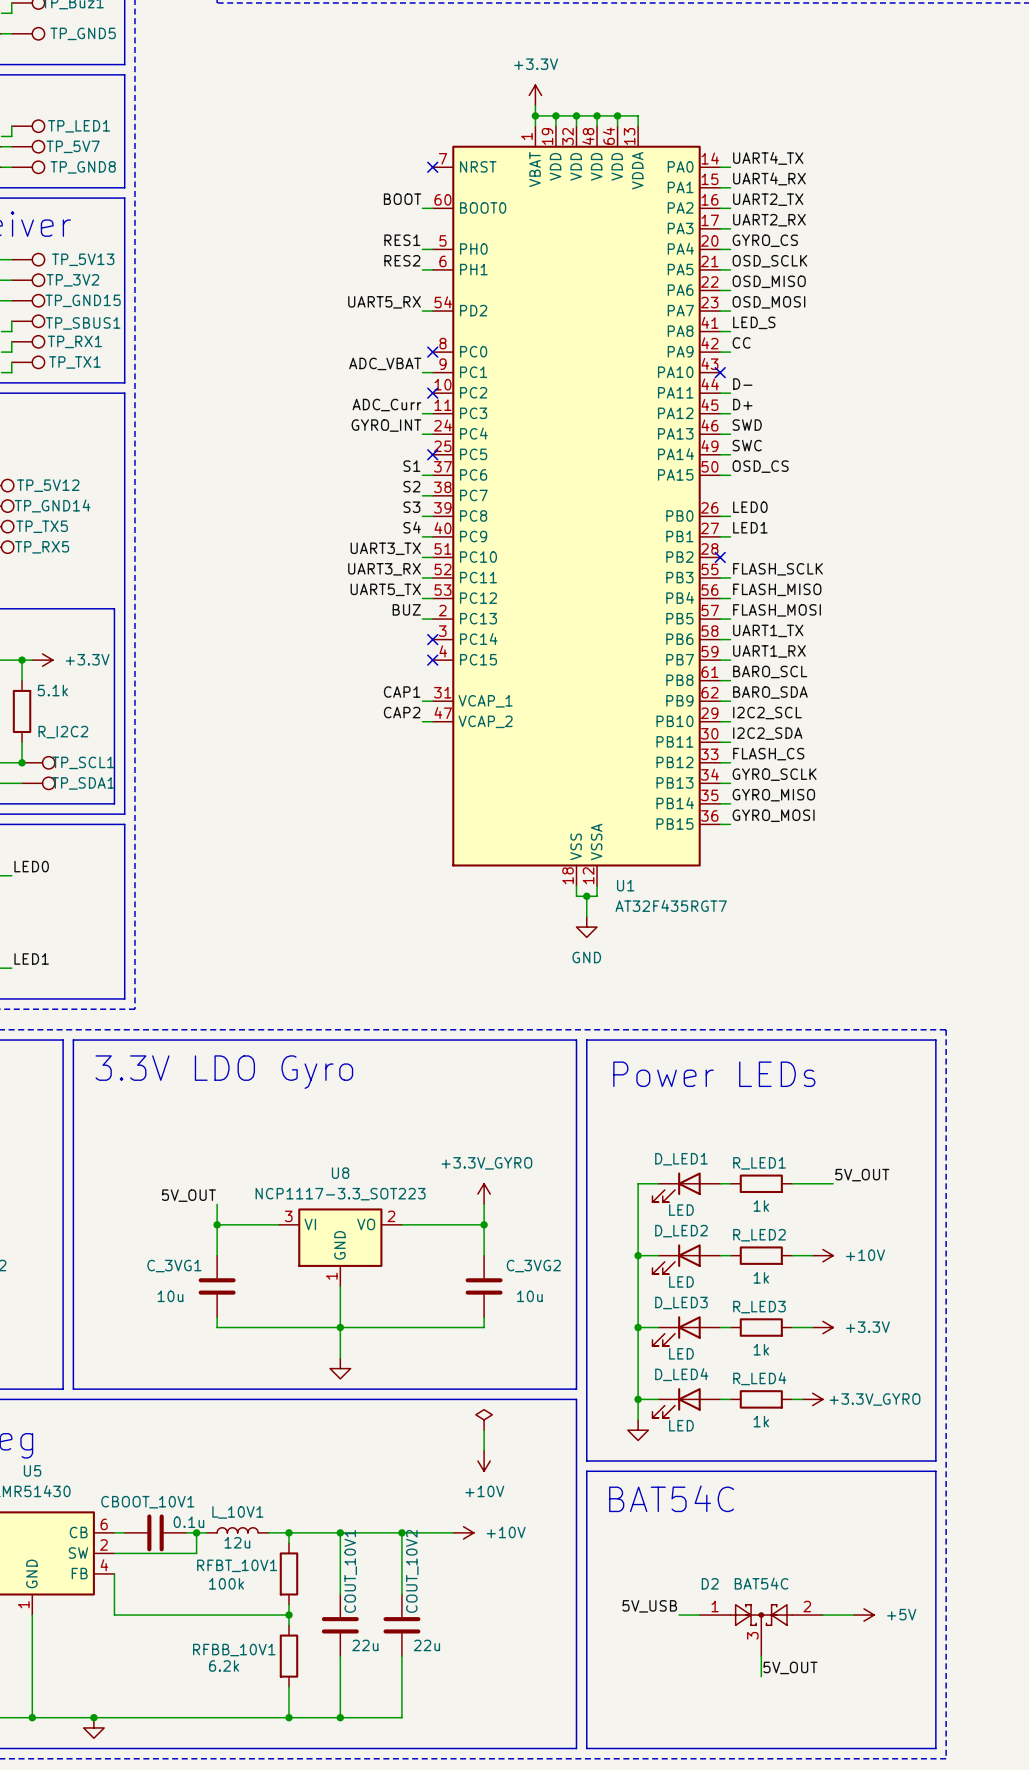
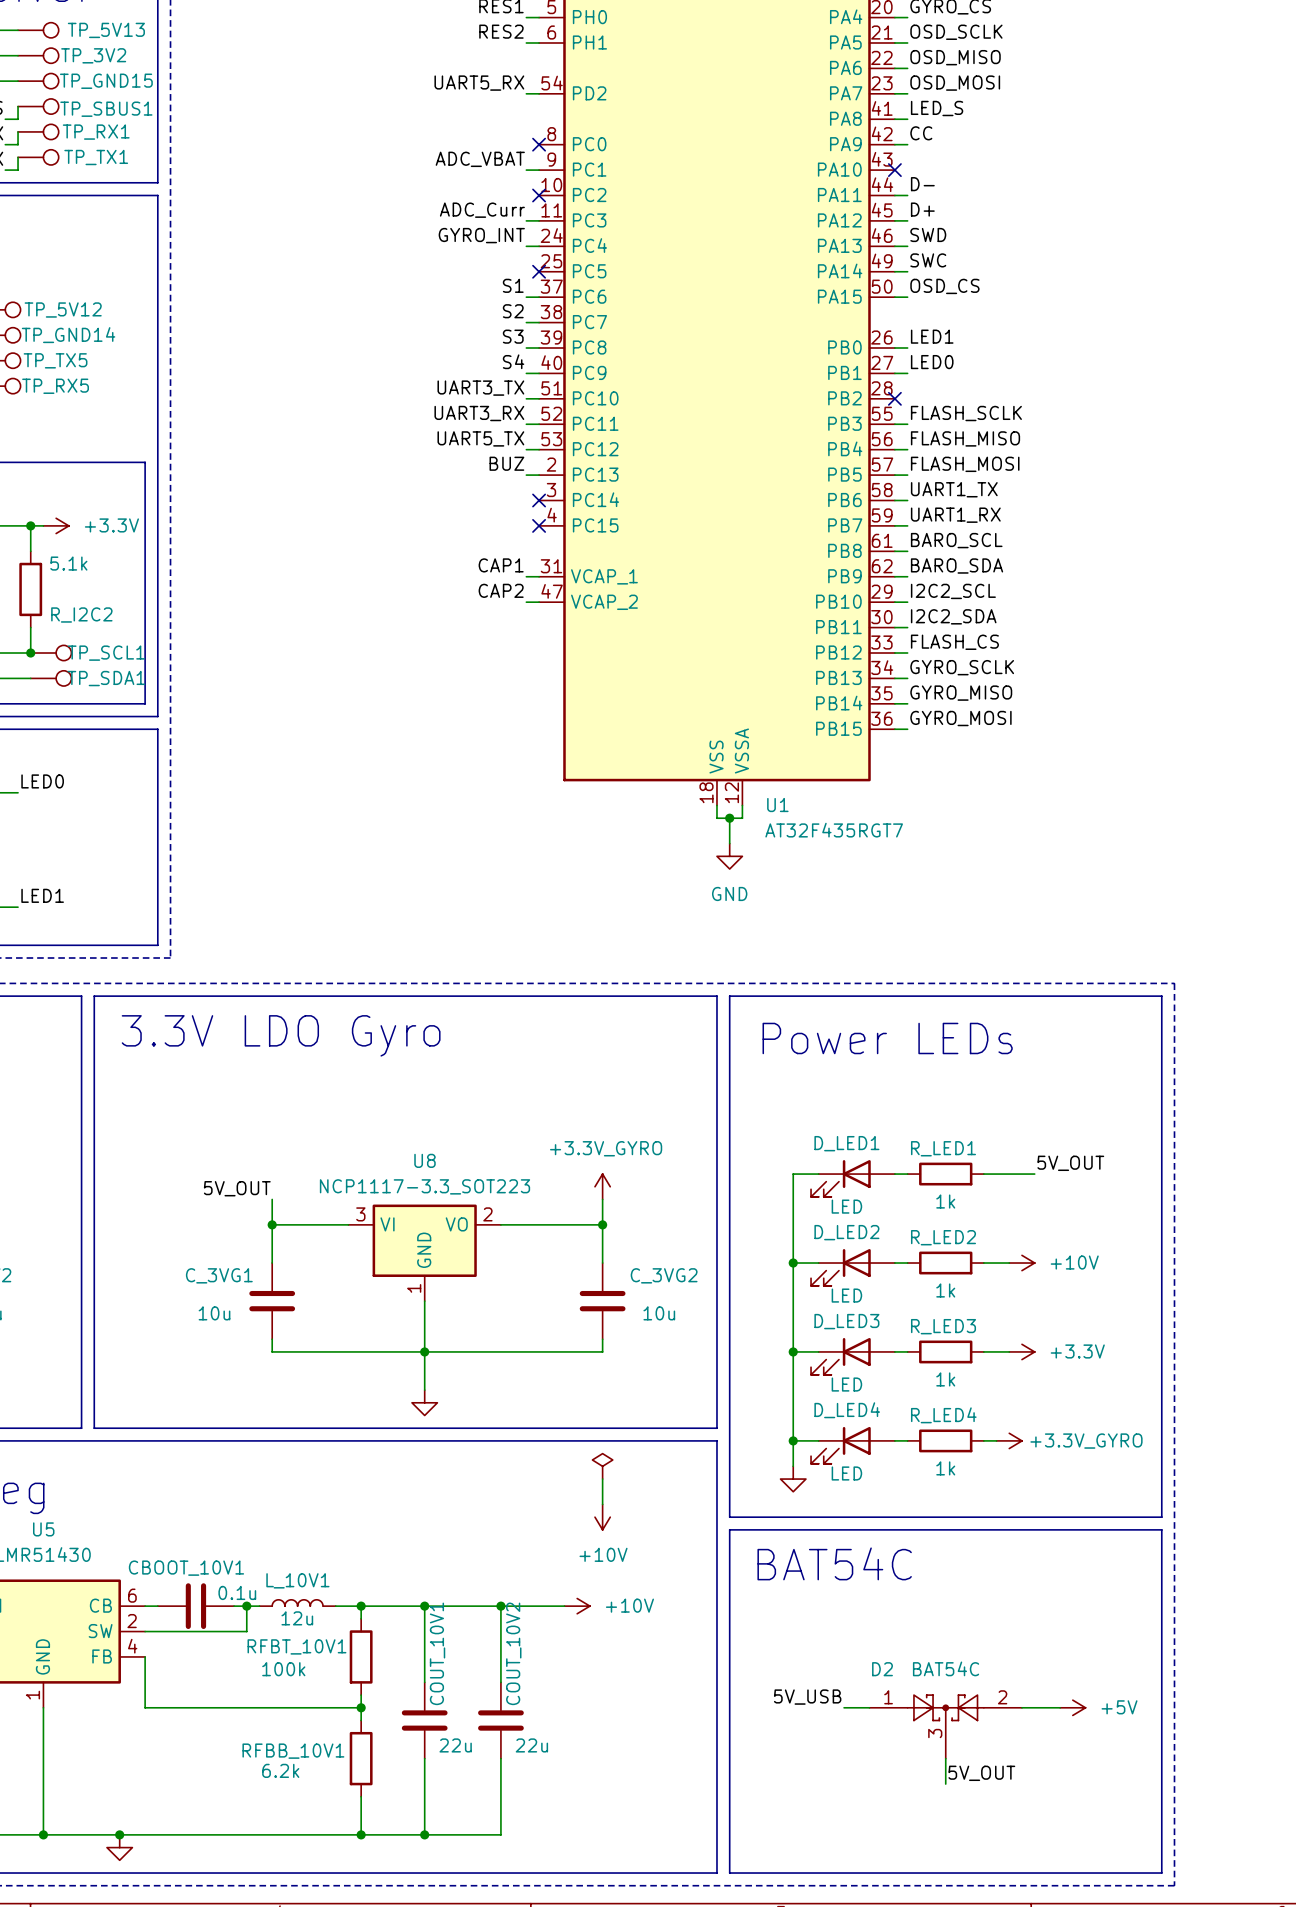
label: LED0 (750, 507) -> LED1 (932, 336)
label: LED1 (750, 527) -> LED0 (932, 362)

